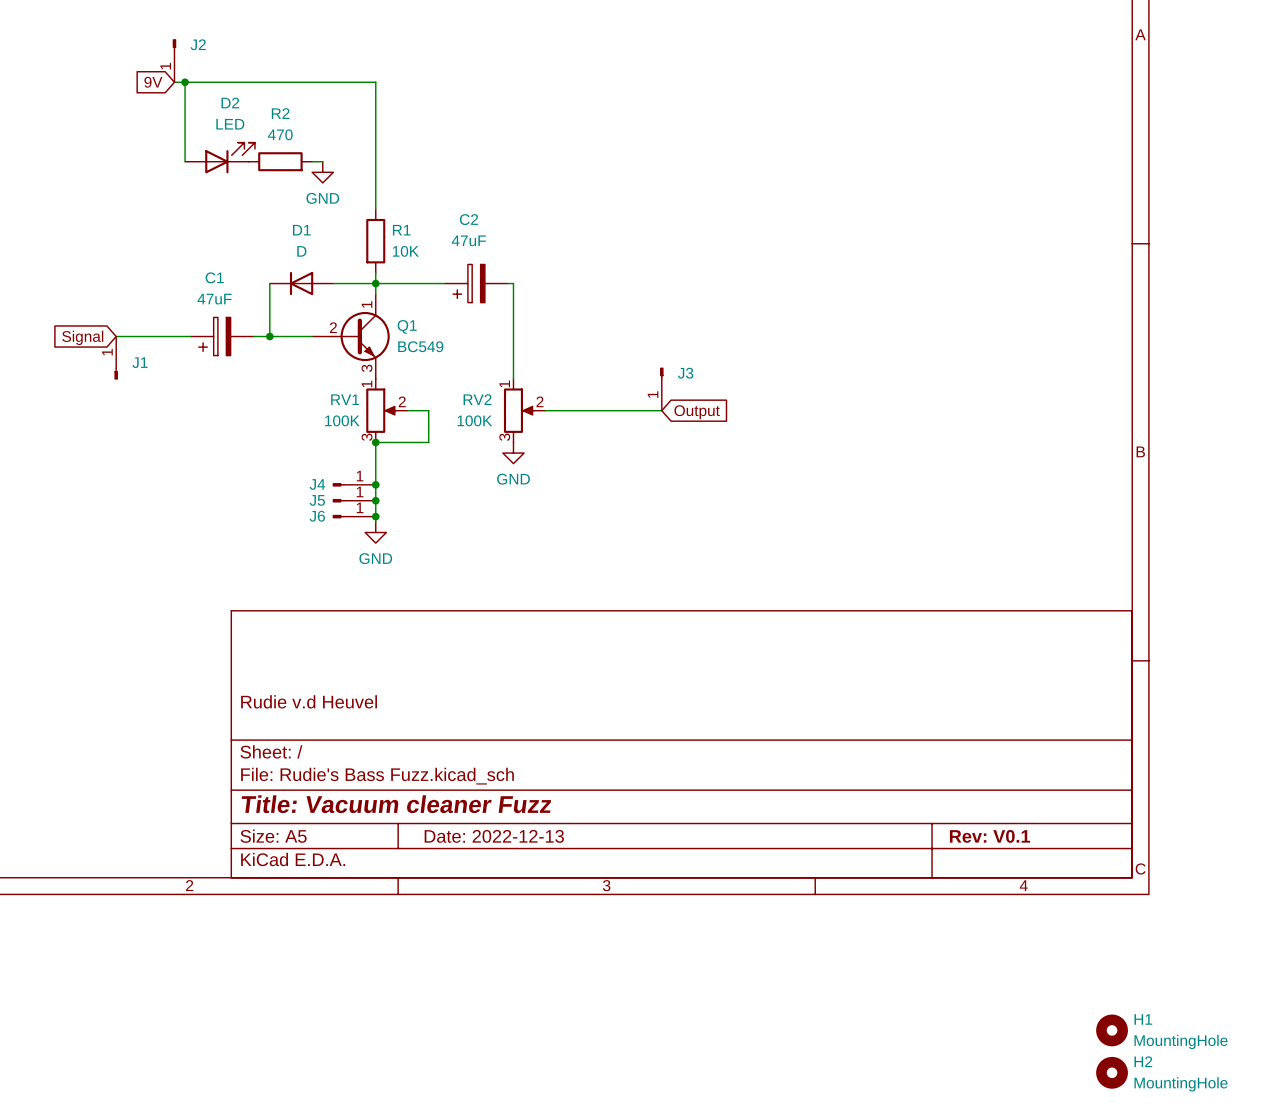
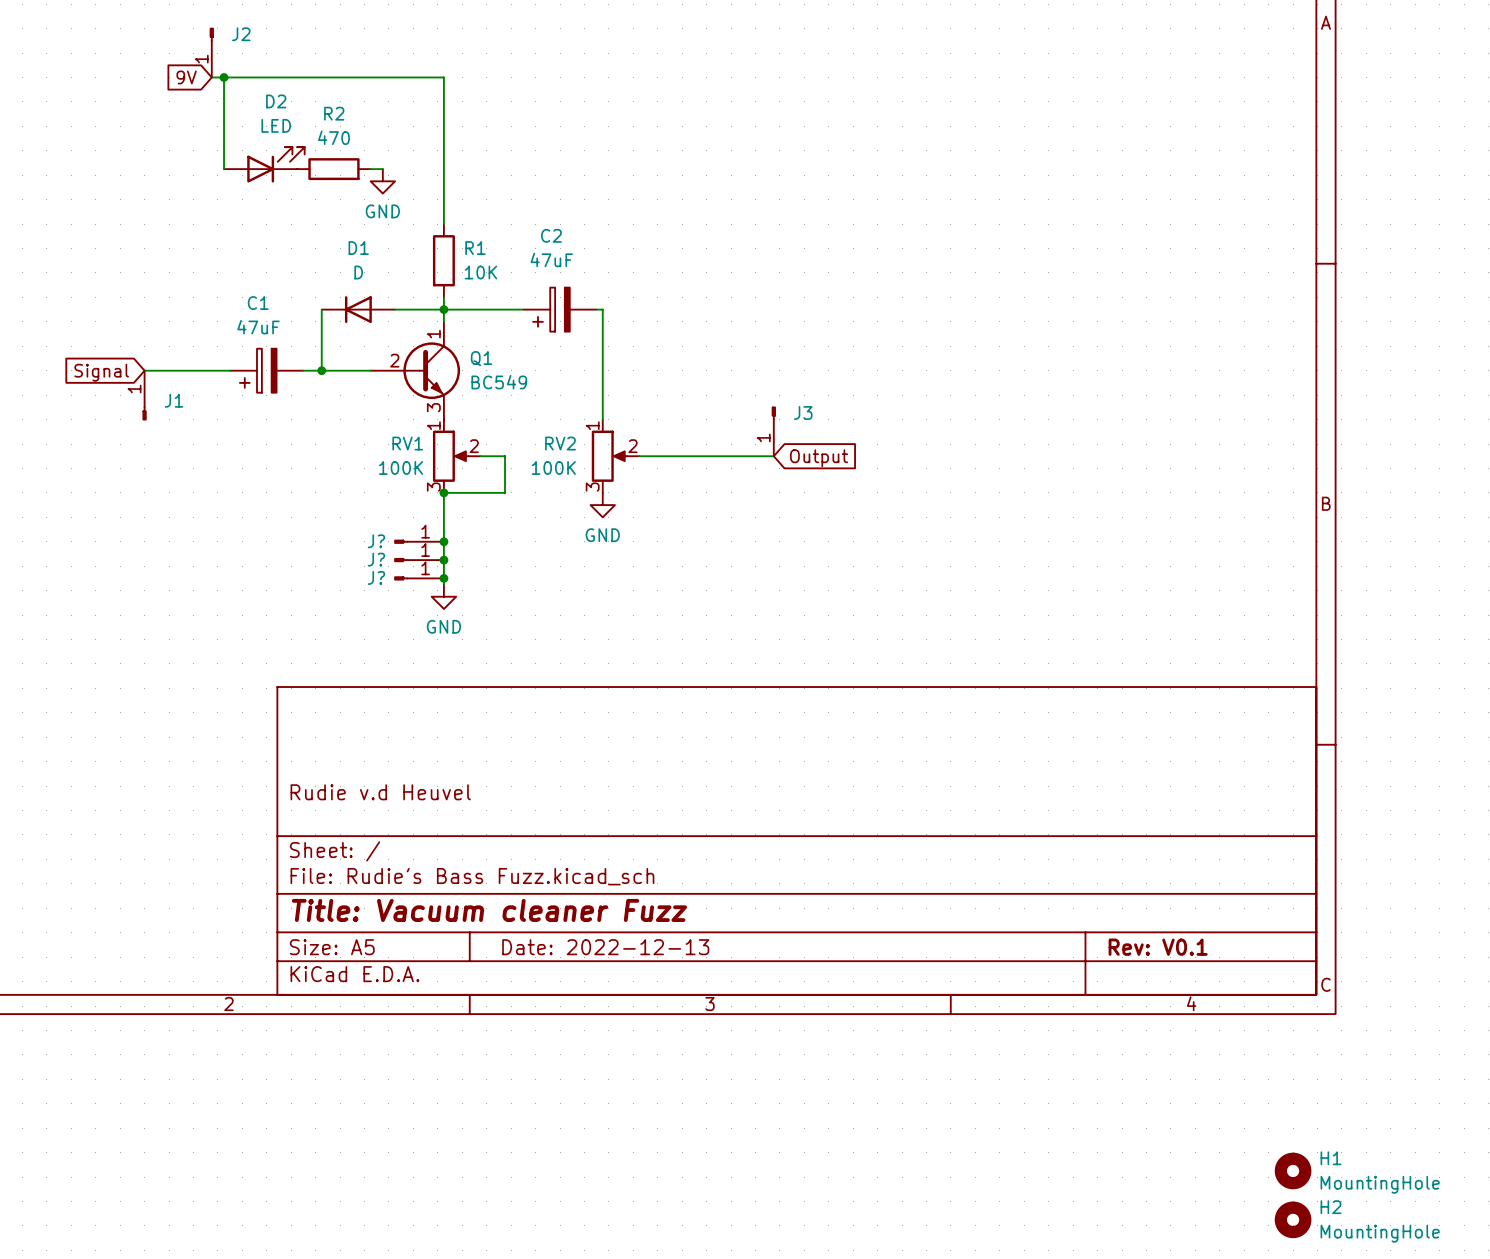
J4 name: J4 (317, 484) -> J? (376, 541)
J5 name: J5 (317, 500) -> J? (376, 559)
J6 name: J6 (317, 516) -> J? (376, 577)

